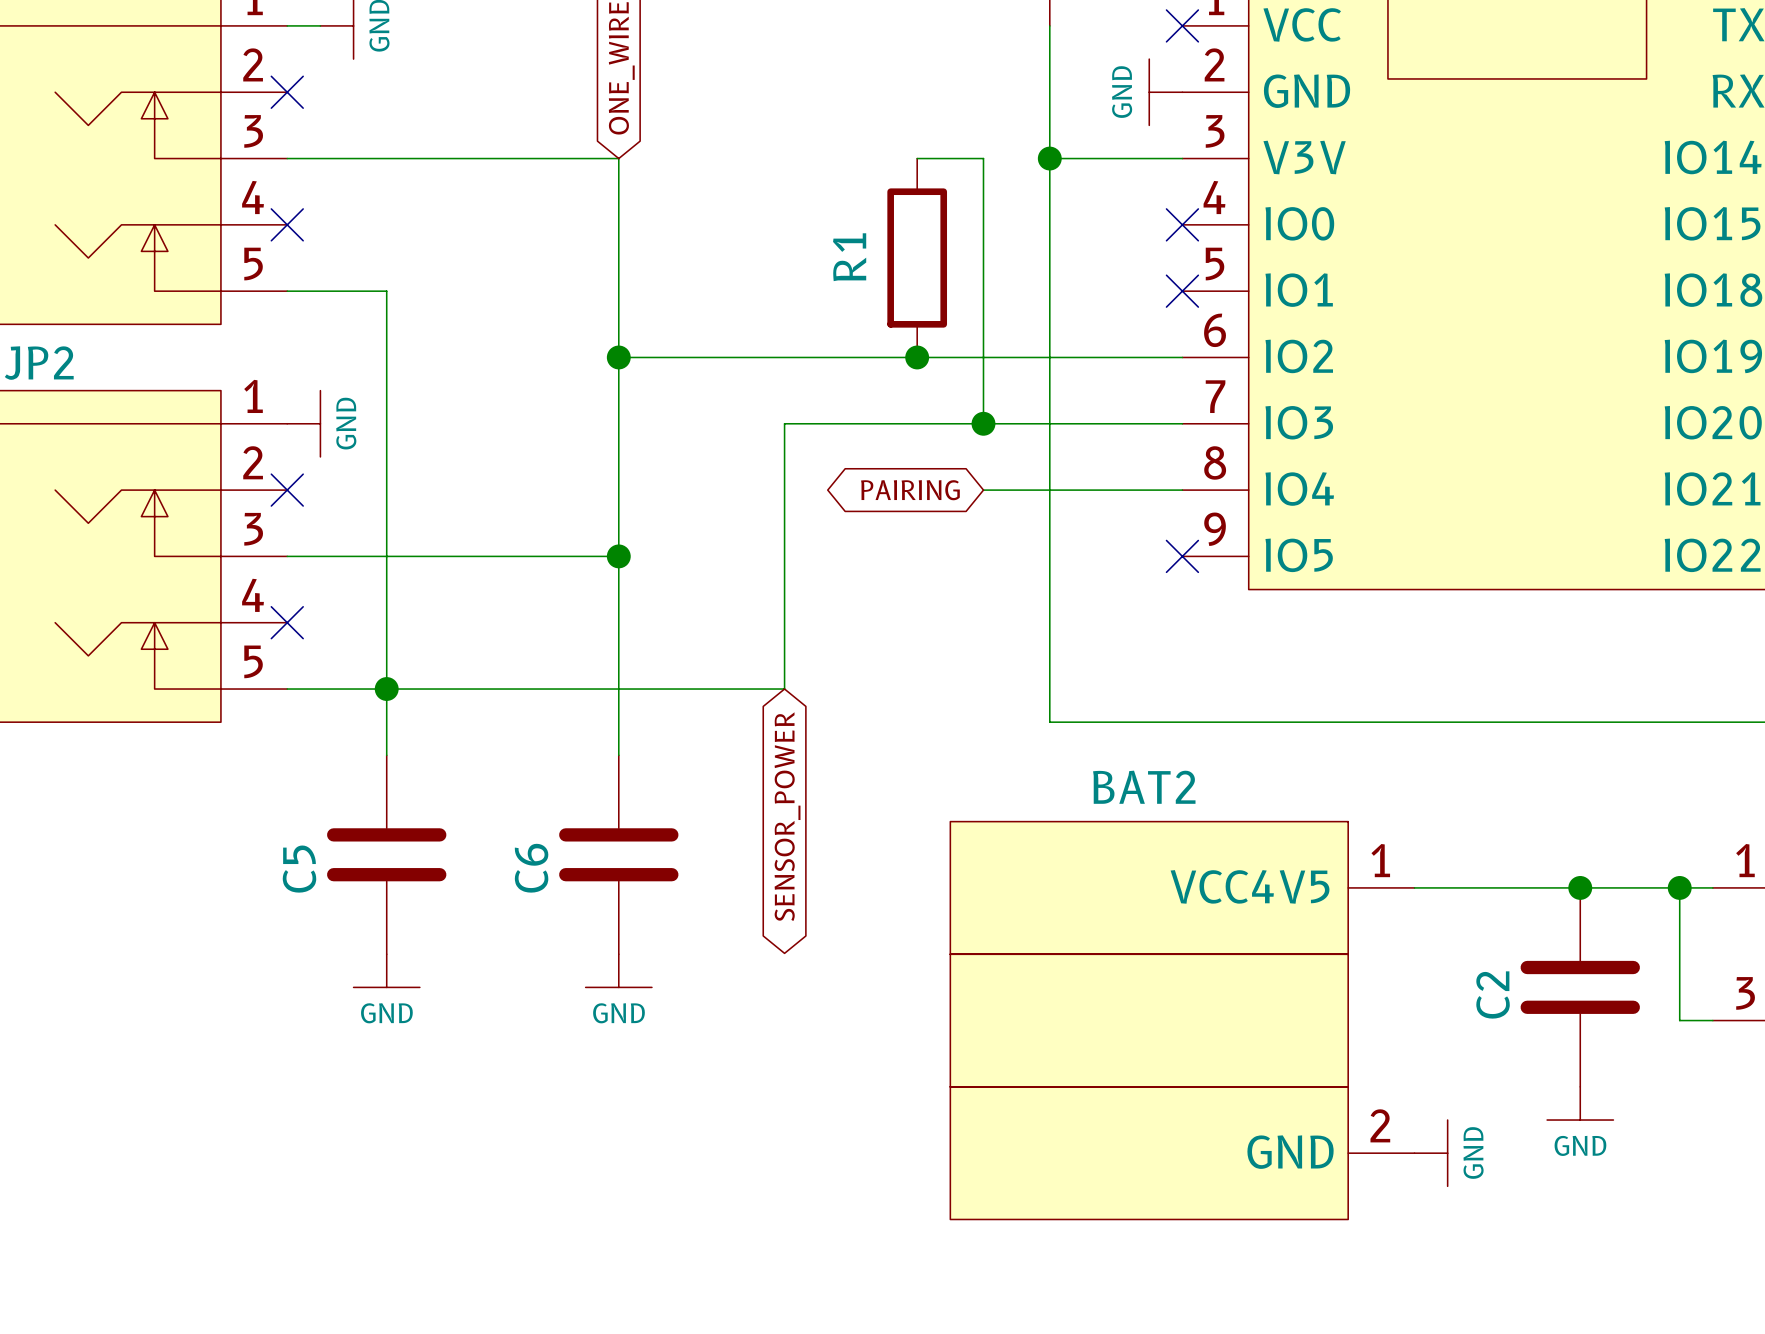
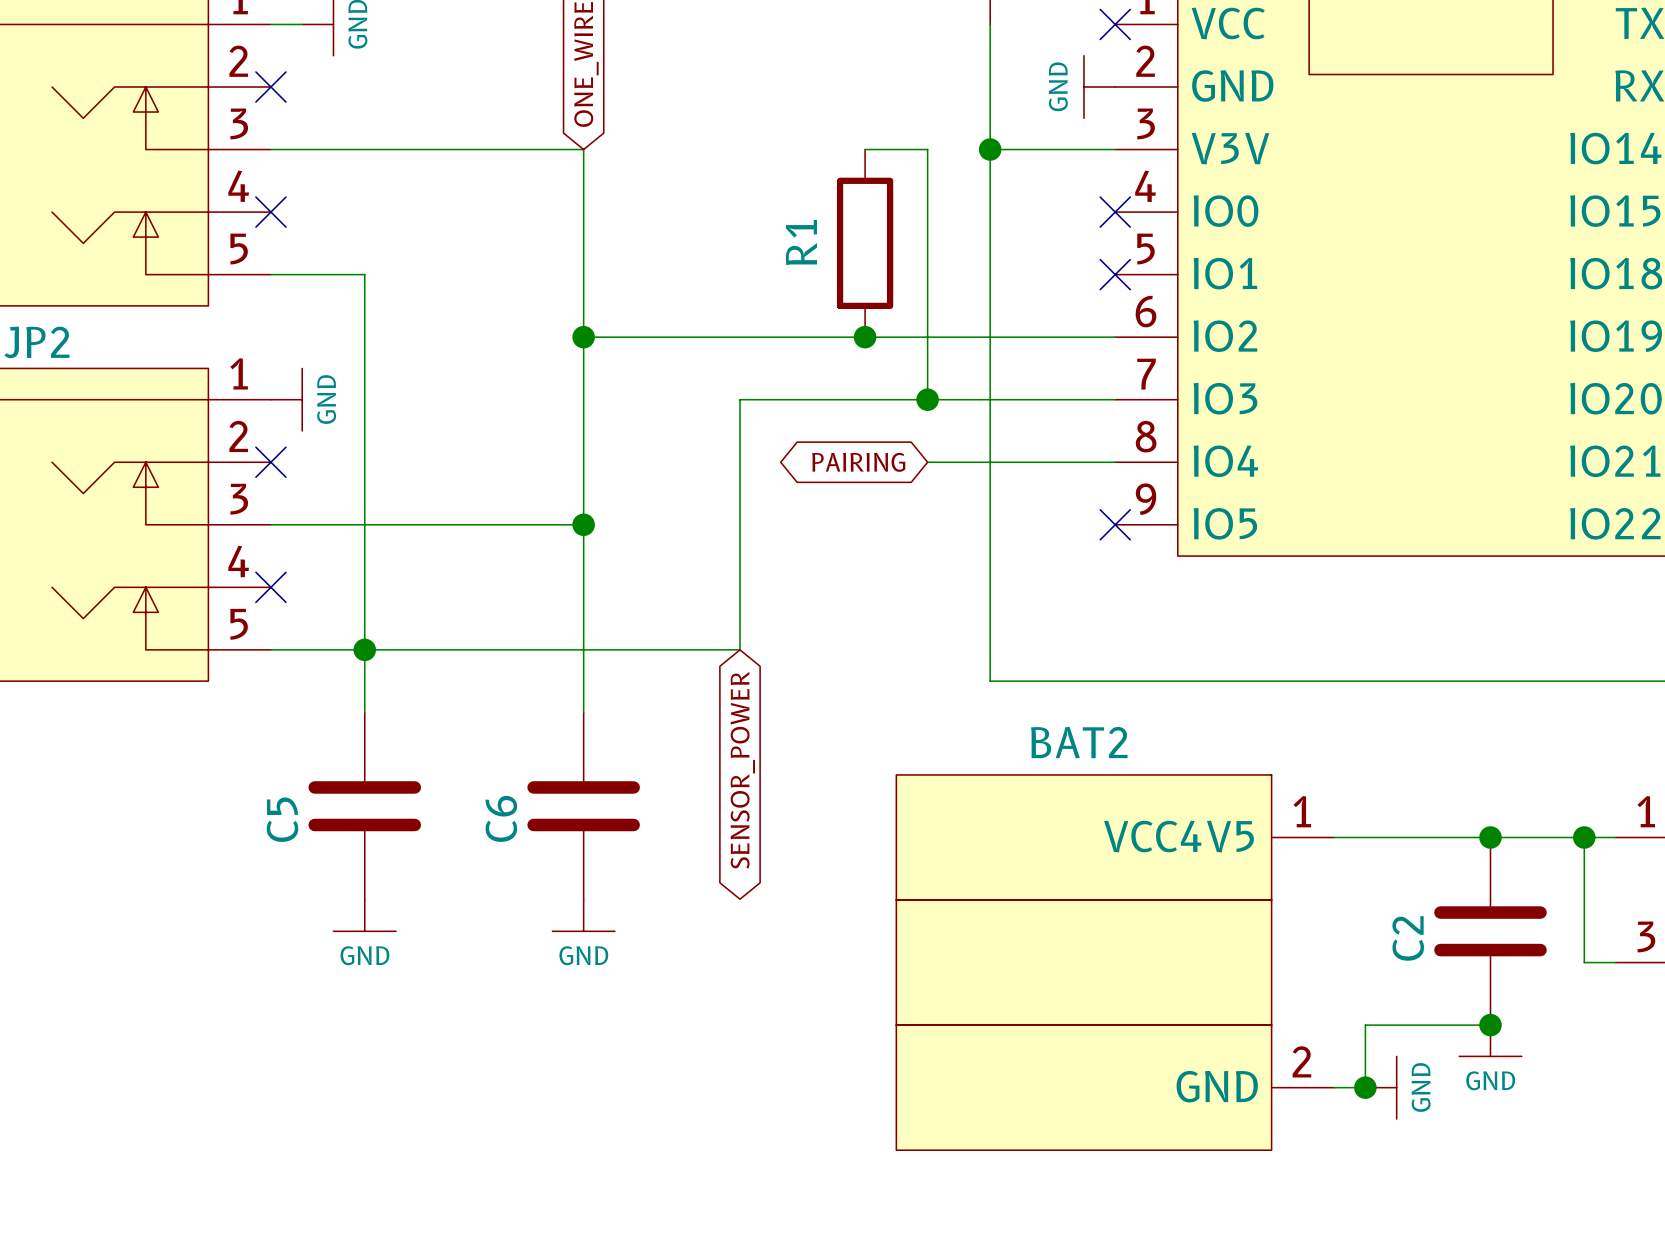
wire: none -> (1490, 1025) (1365, 1025) (1365, 1087) (1334, 1087)
junction: none -> (1490, 1025)
power symbol position: GND (1431, 1153) -> GND (1381, 1087)
junction: none -> (1365, 1087)

